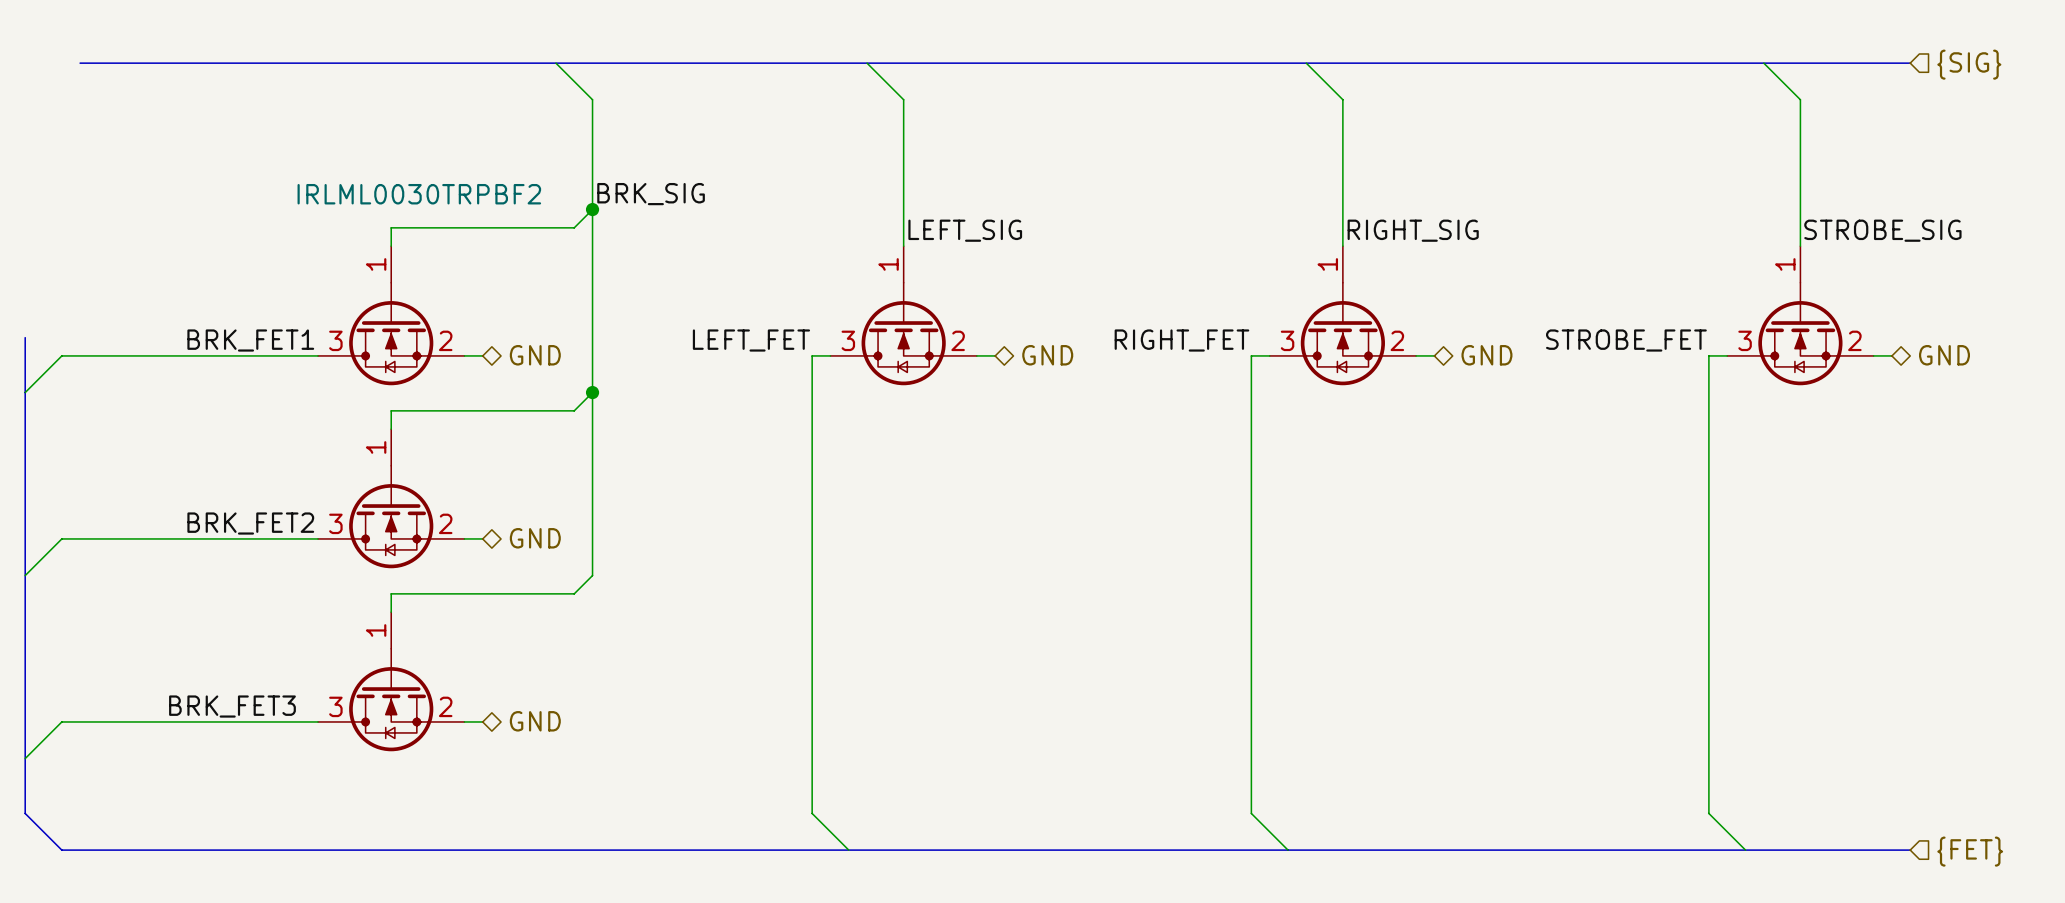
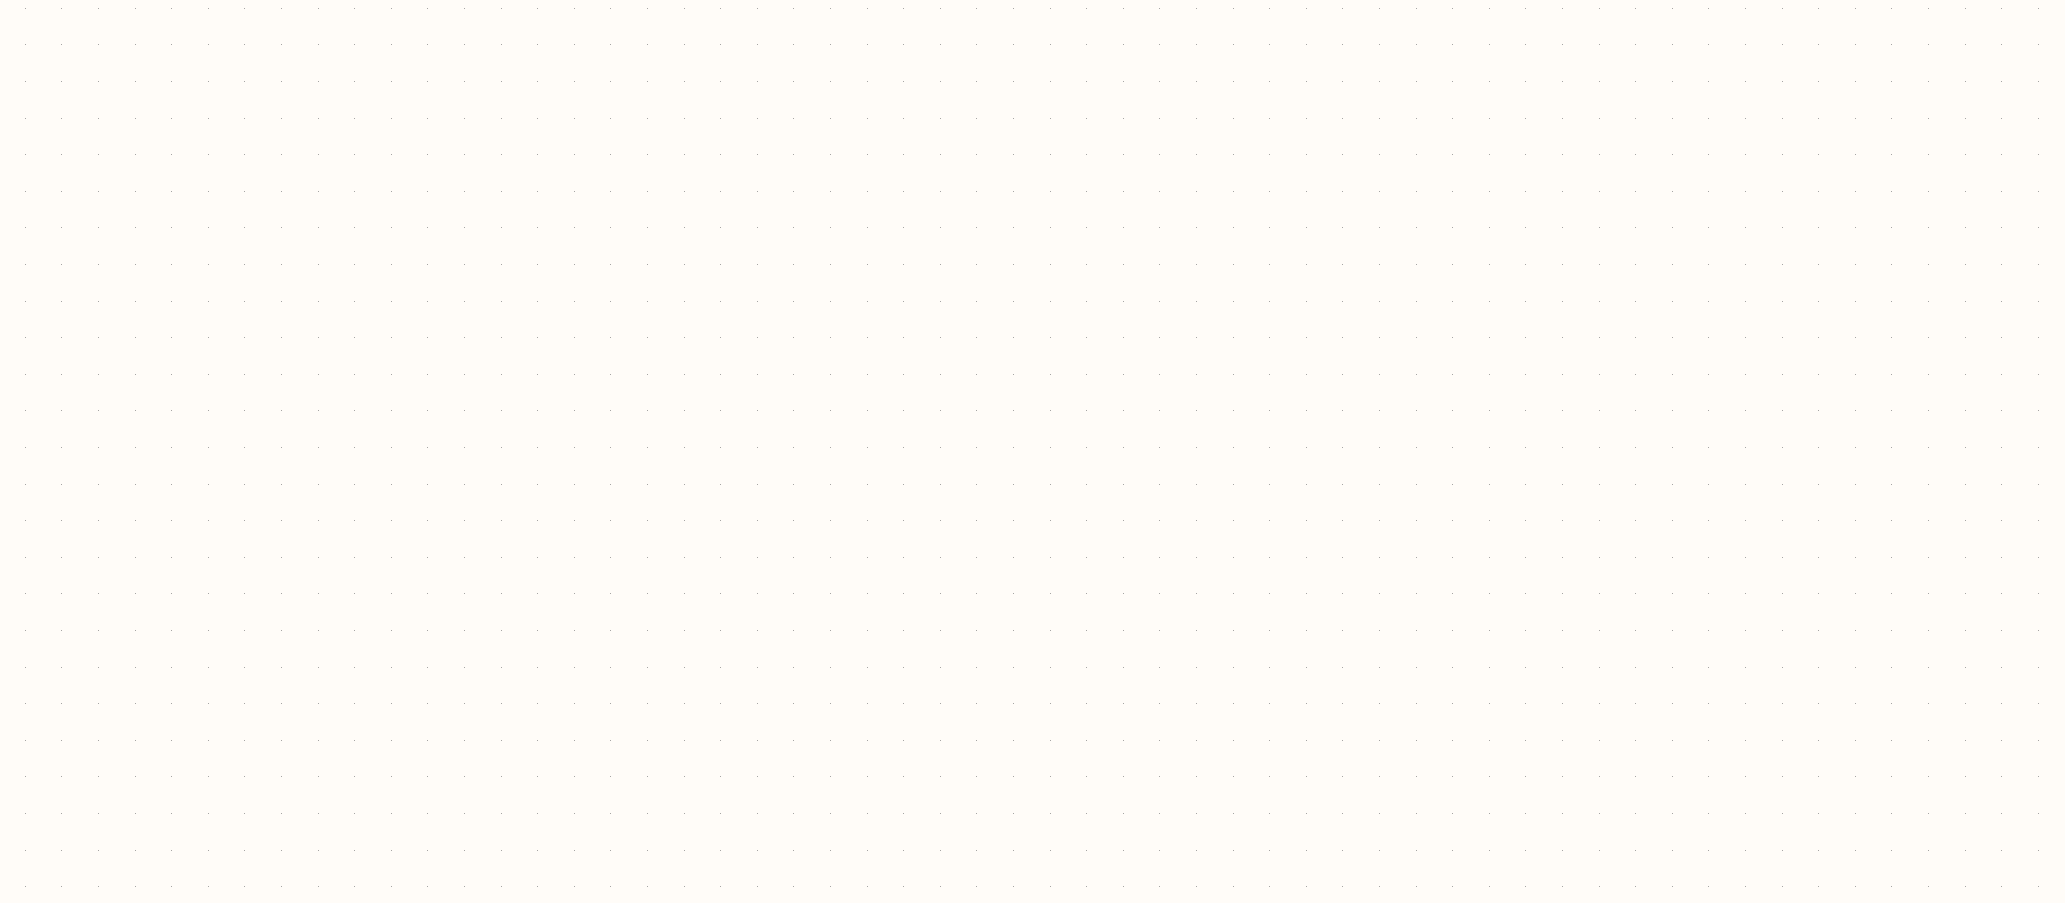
bus: (80, 63) (1910, 63) -> none
wire: (555, 63) (592, 99) (592, 575) (574, 593) (391, 593) (391, 612) -> none
wire: (867, 63) (903, 99) (903, 246) -> none
wire: (1306, 63) (1342, 99) (1342, 246) -> none
wire: (1763, 63) (1800, 99) (1800, 246) -> none
hierarchical label: {SIG} (1969, 64) -> none
label: BRK_SIG (651, 194) -> none
wire: (592, 209) (574, 227) (391, 227) (391, 246) -> none
junction: (592, 209) -> none
label: LEFT_SIG (965, 230) -> none
label: RIGHT_SIG (1413, 230) -> none
label: STROBE_SIG (1882, 230) -> none
IRLML0030TRPBF2: (391, 315) -> none
part: (903, 315) -> none
part: (1342, 315) -> none
part: (1800, 315) -> none
bus: (25, 337) (25, 813) (61, 850) (1910, 850) -> none
label: BRK_FET1 (250, 340) -> none
label: LEFT_FET (751, 340) -> none
label: RIGHT_FET (1181, 340) -> none
label: STROBE_FET (1626, 340) -> none
wire: (318, 355) (61, 355) (25, 392) -> none
wire: (464, 355) (482, 355) -> none
hierarchical label: GND (535, 355) -> none
wire: (830, 355) (812, 355) (812, 813) (848, 850) -> none
wire: (976, 355) (995, 355) -> none
hierarchical label: GND (1047, 355) -> none
wire: (1269, 355) (1251, 355) (1251, 813) (1287, 850) -> none
wire: (1416, 355) (1434, 355) -> none
hierarchical label: GND (1486, 355) -> none
wire: (1727, 355) (1708, 355) (1708, 813) (1745, 850) -> none
wire: (1873, 355) (1891, 355) -> none
hierarchical label: GND (1944, 355) -> none
wire: (592, 392) (574, 410) (391, 410) (391, 429) -> none
junction: (592, 392) -> none
part: (391, 498) -> none
label: BRK_FET2 (250, 523) -> none
wire: (318, 538) (61, 538) (25, 575) -> none
wire: (464, 538) (482, 538) -> none
hierarchical label: GND (535, 538) -> none
part: (391, 681) -> none
label: BRK_FET3 (232, 706) -> none
wire: (318, 721) (61, 721) (25, 758) -> none
wire: (464, 721) (482, 721) -> none
hierarchical label: GND (535, 721) -> none
hierarchical label: {FET} (1970, 851) -> none

